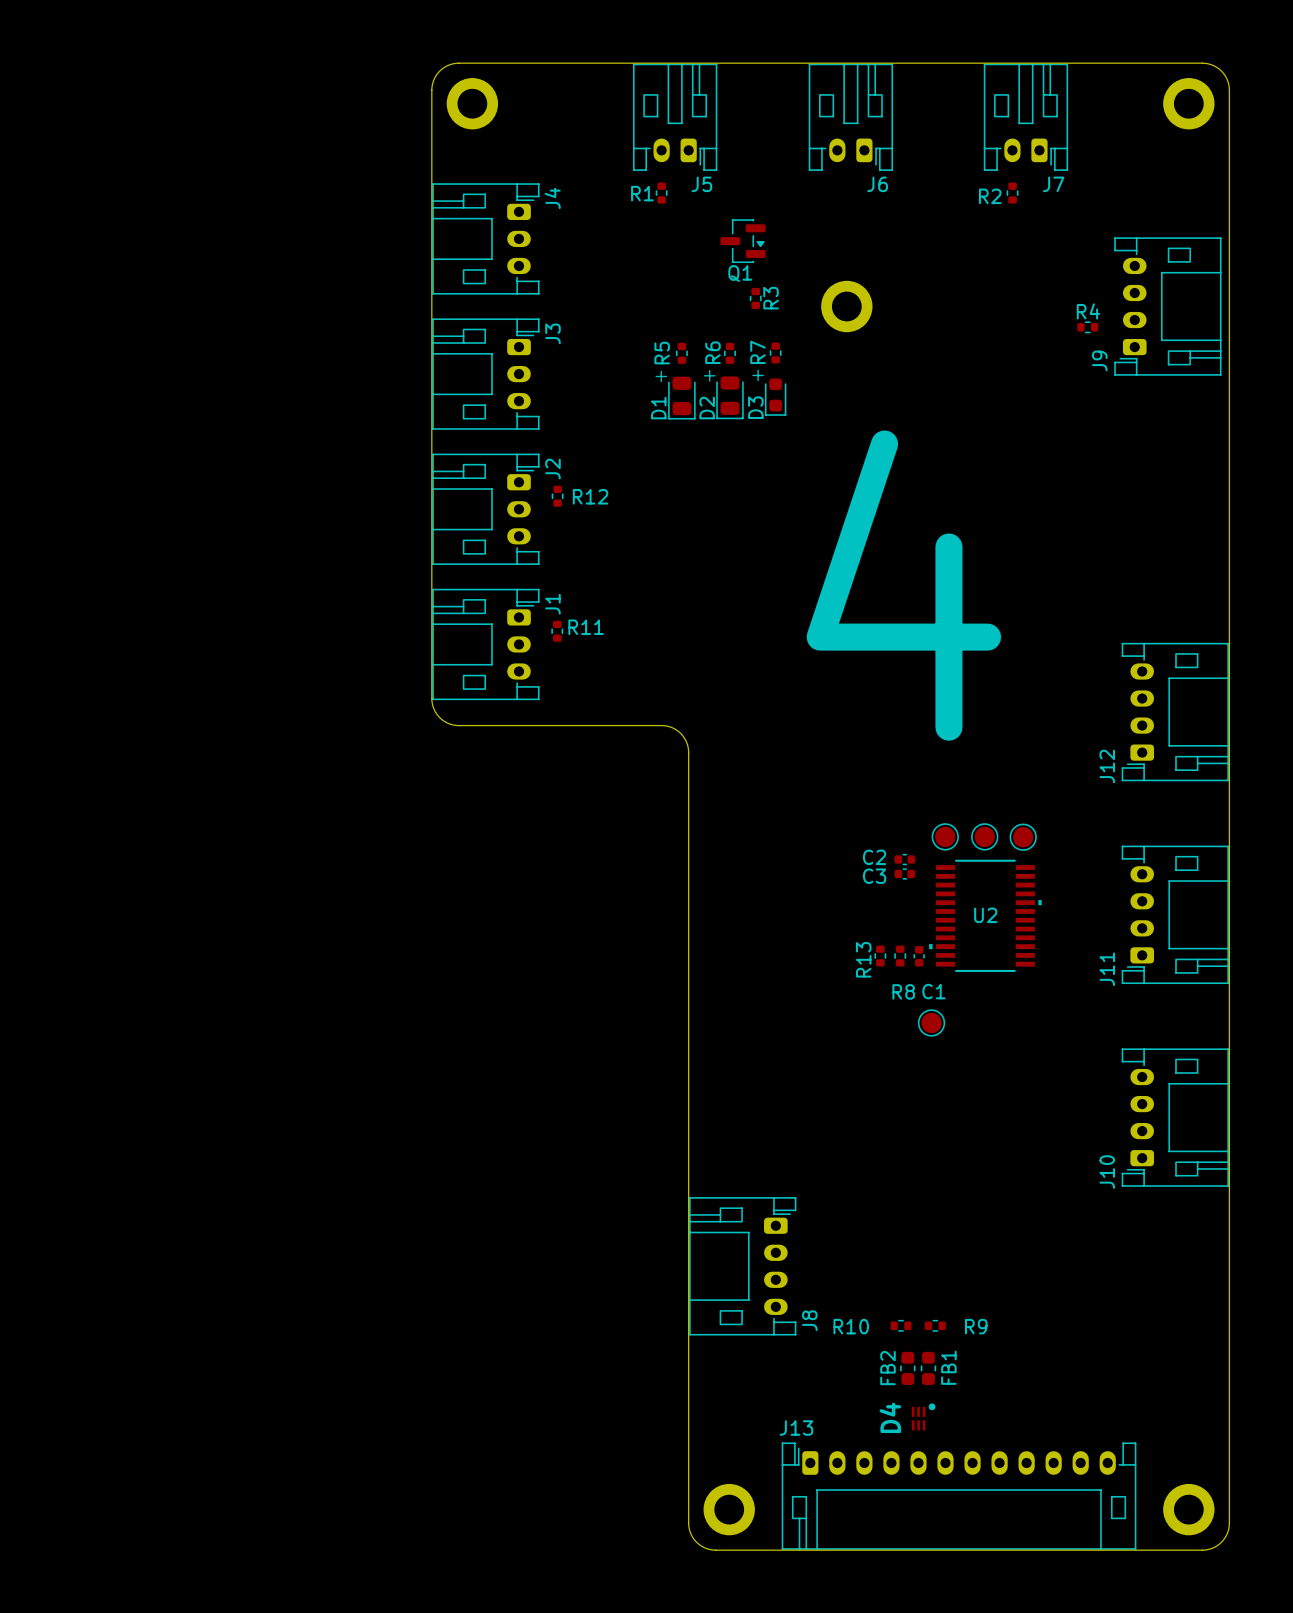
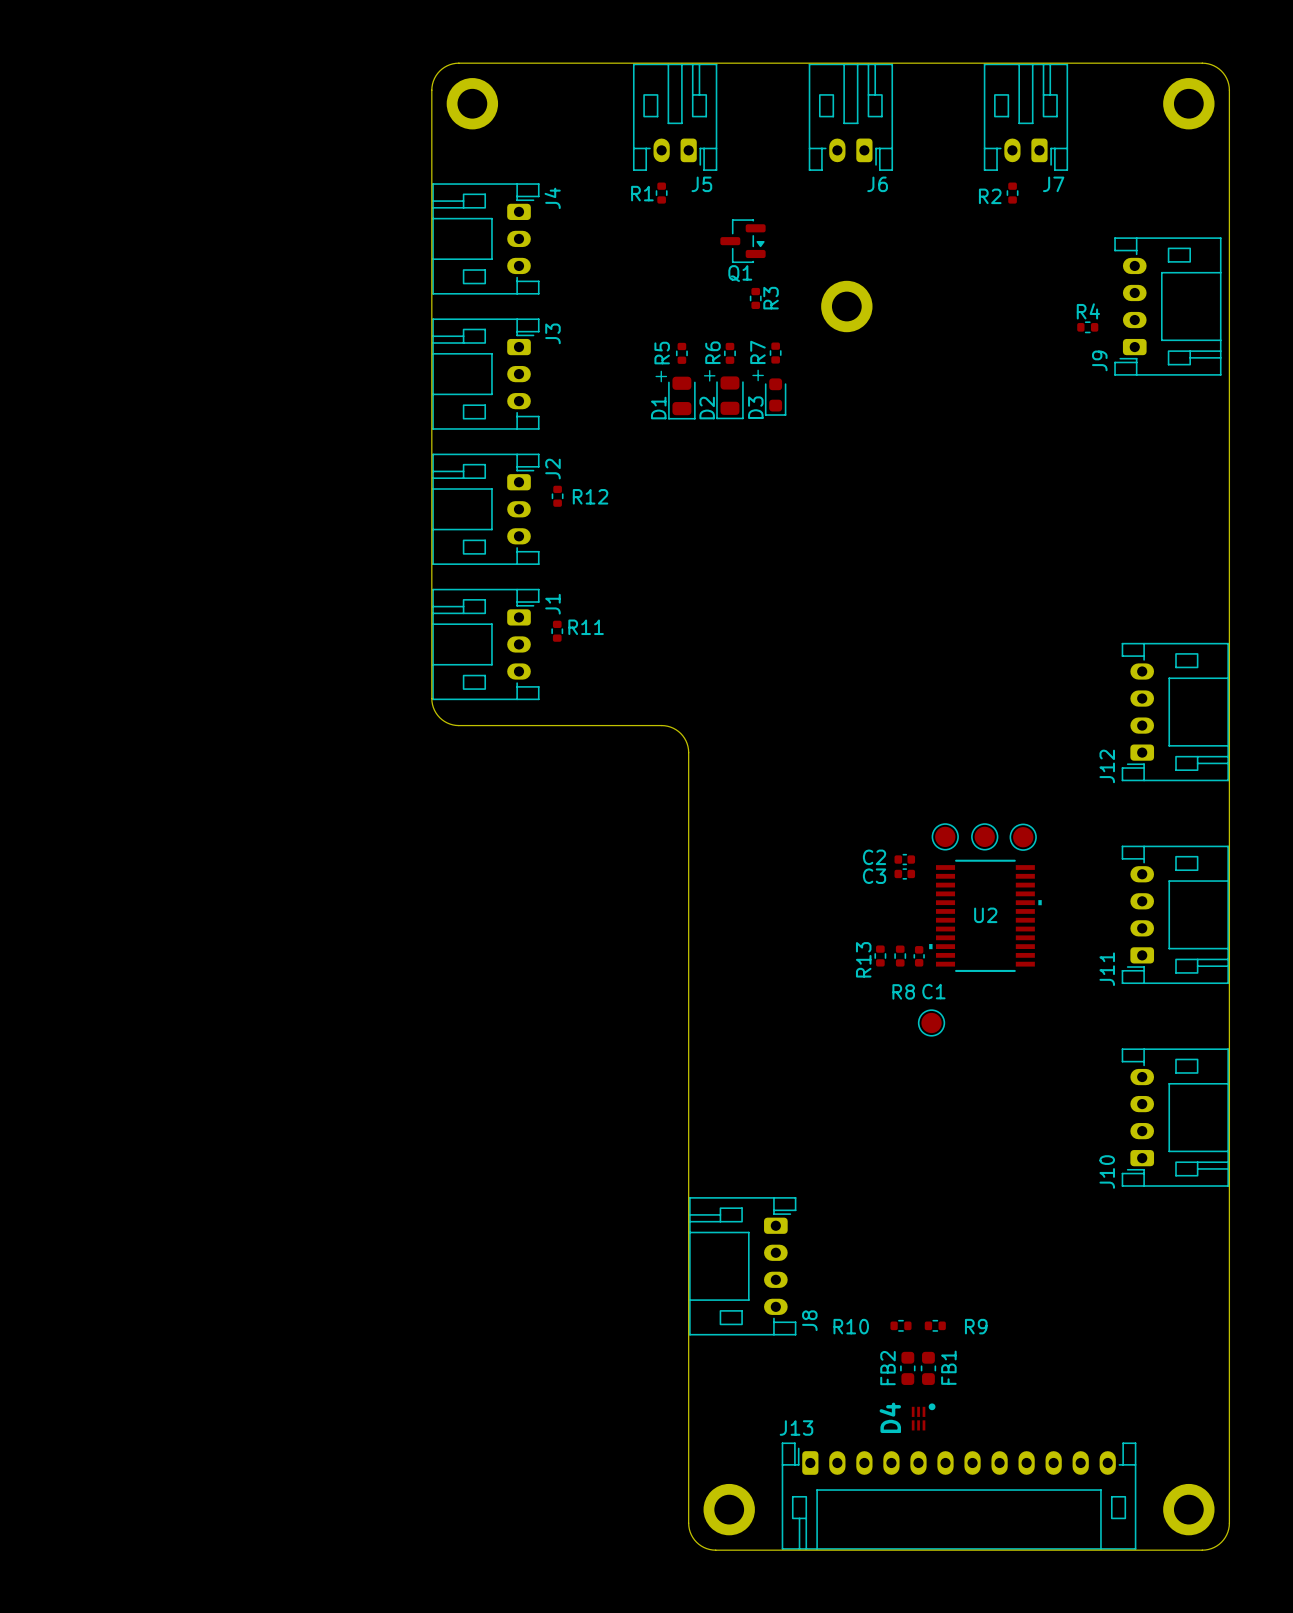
text: 4 (903, 585) -> none

